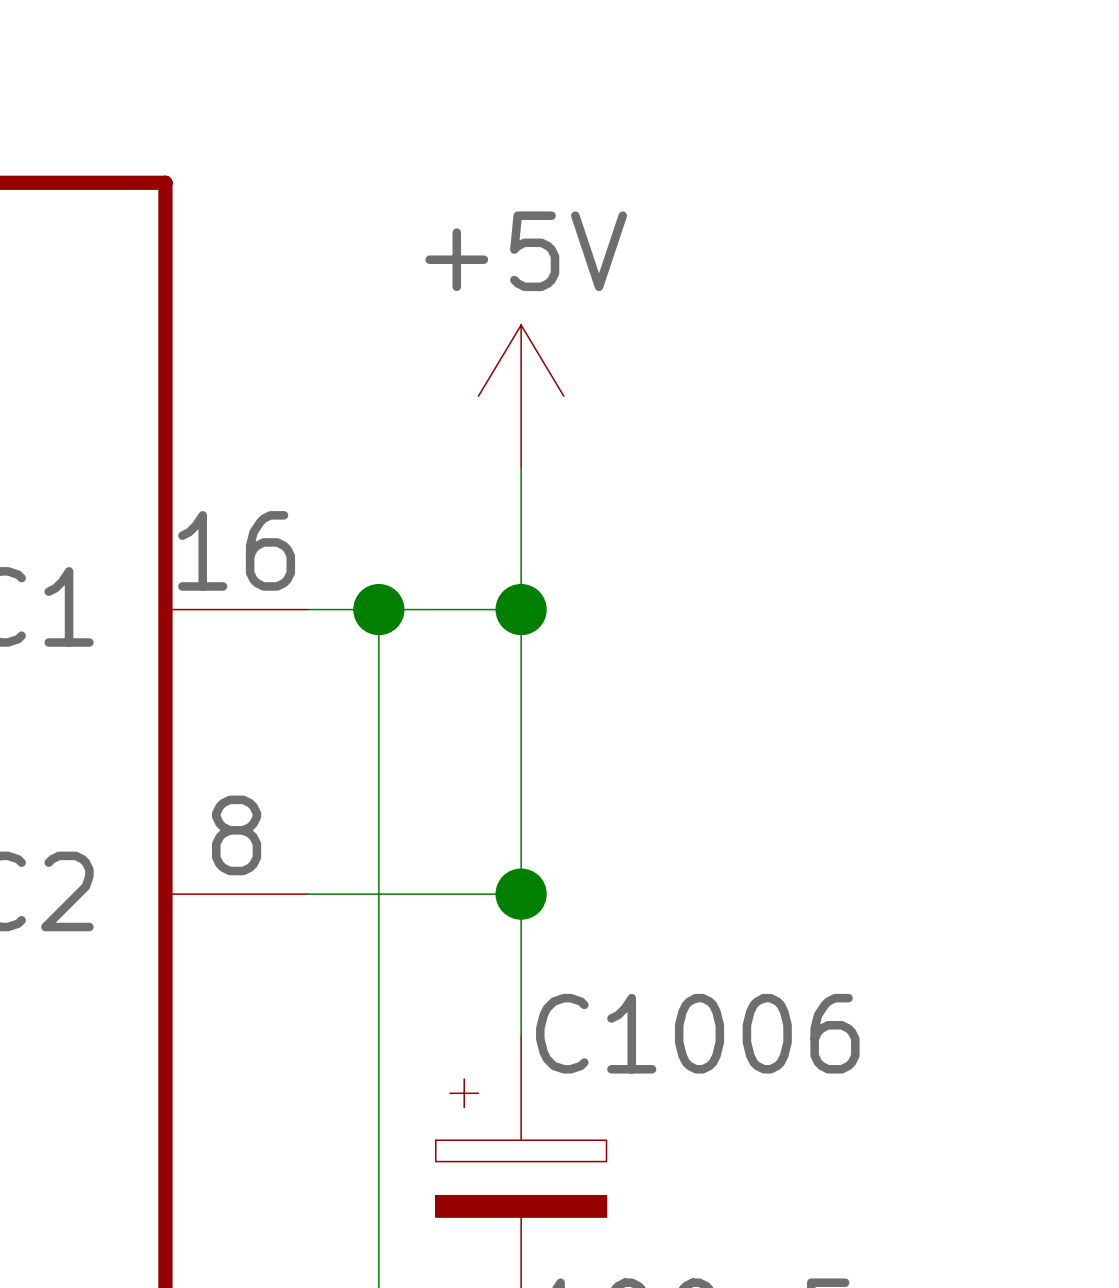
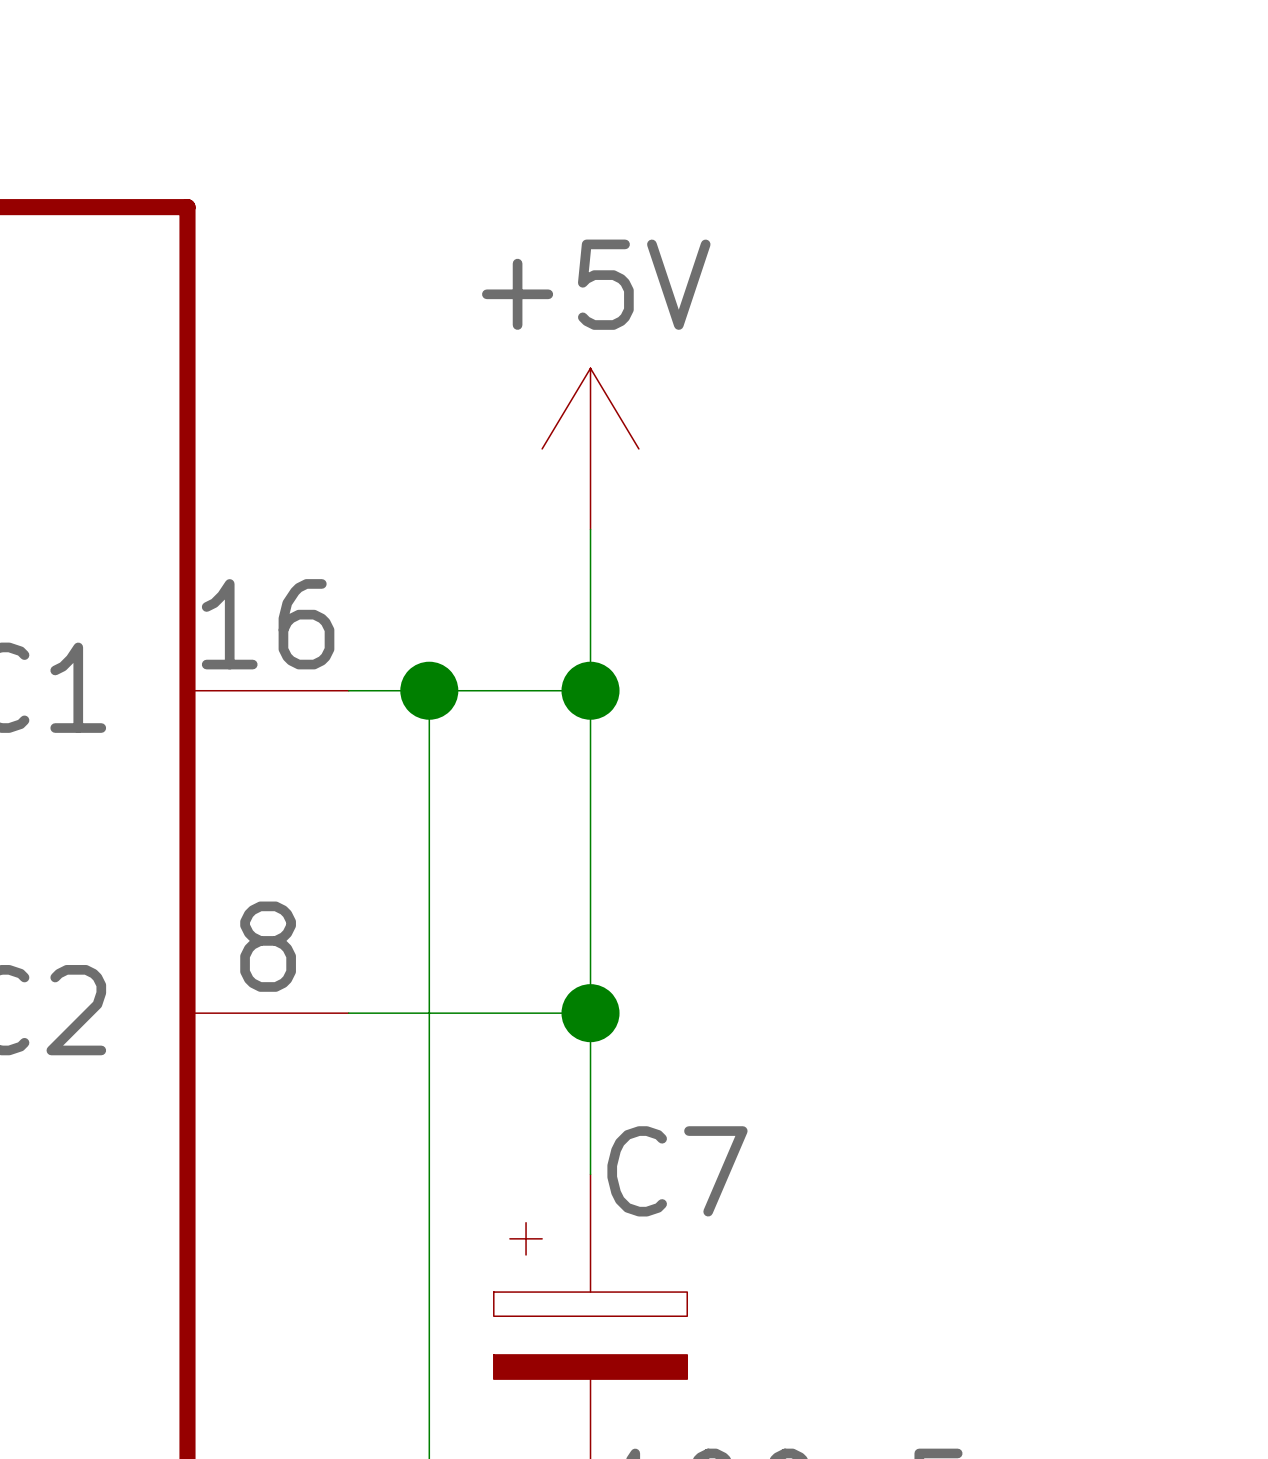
C1006 name: C1006 (697, 1033) -> C7 (677, 1171)

